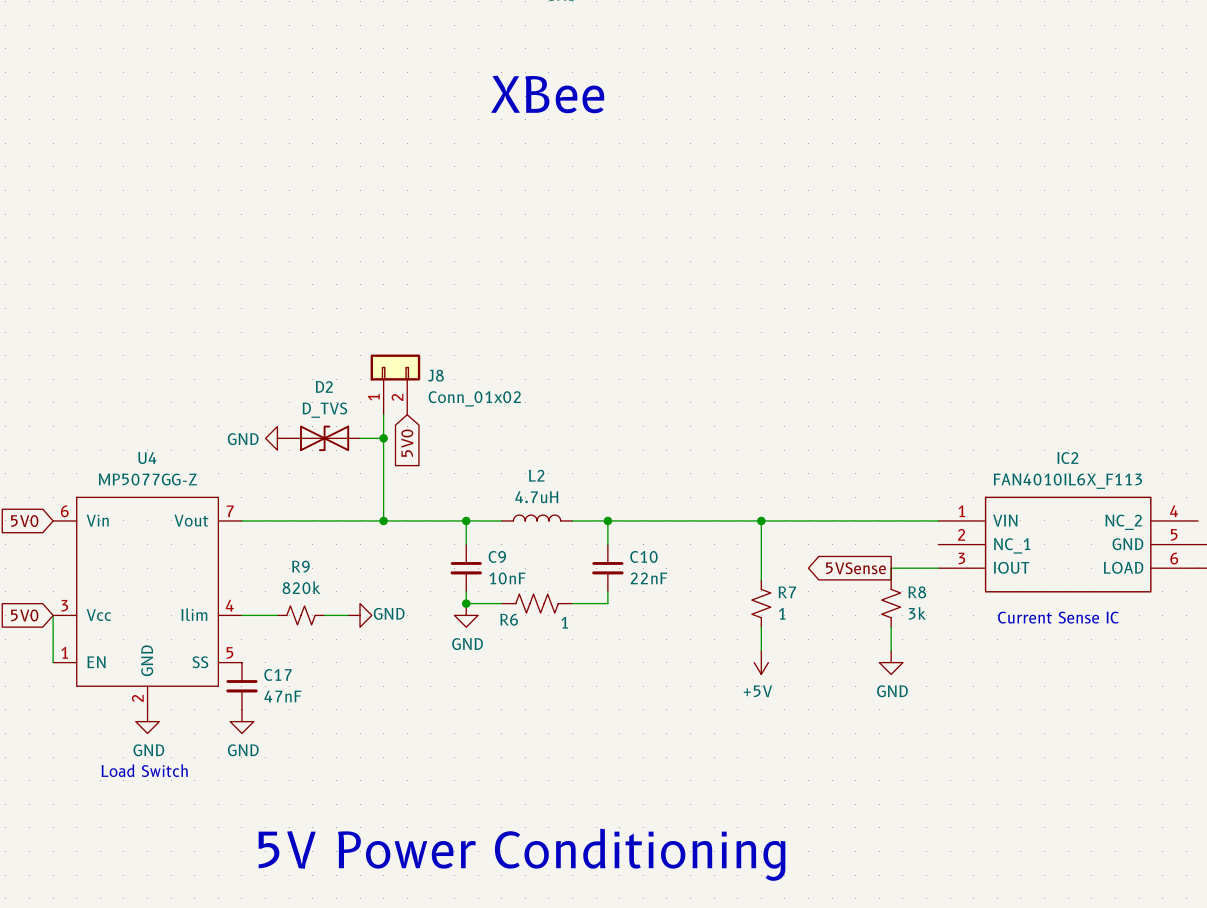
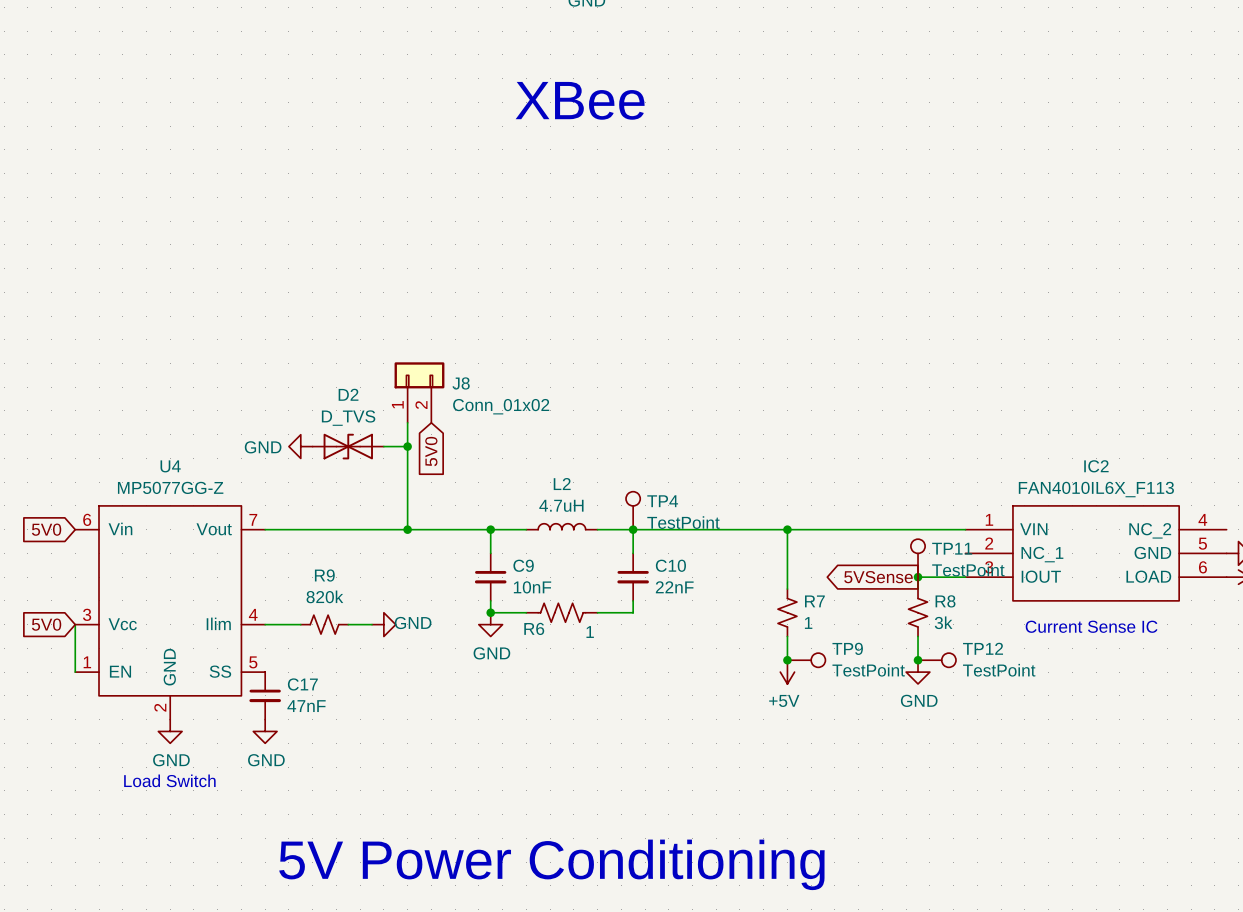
TP4: none -> TestPoint (633, 510)
TP11: none -> TestPoint (918, 558)
junction: none -> (918, 577)
junction: none -> (787, 660)
TP9: none -> TestPoint (806, 660)
junction: none -> (918, 660)
TP12: none -> TestPoint (937, 660)

